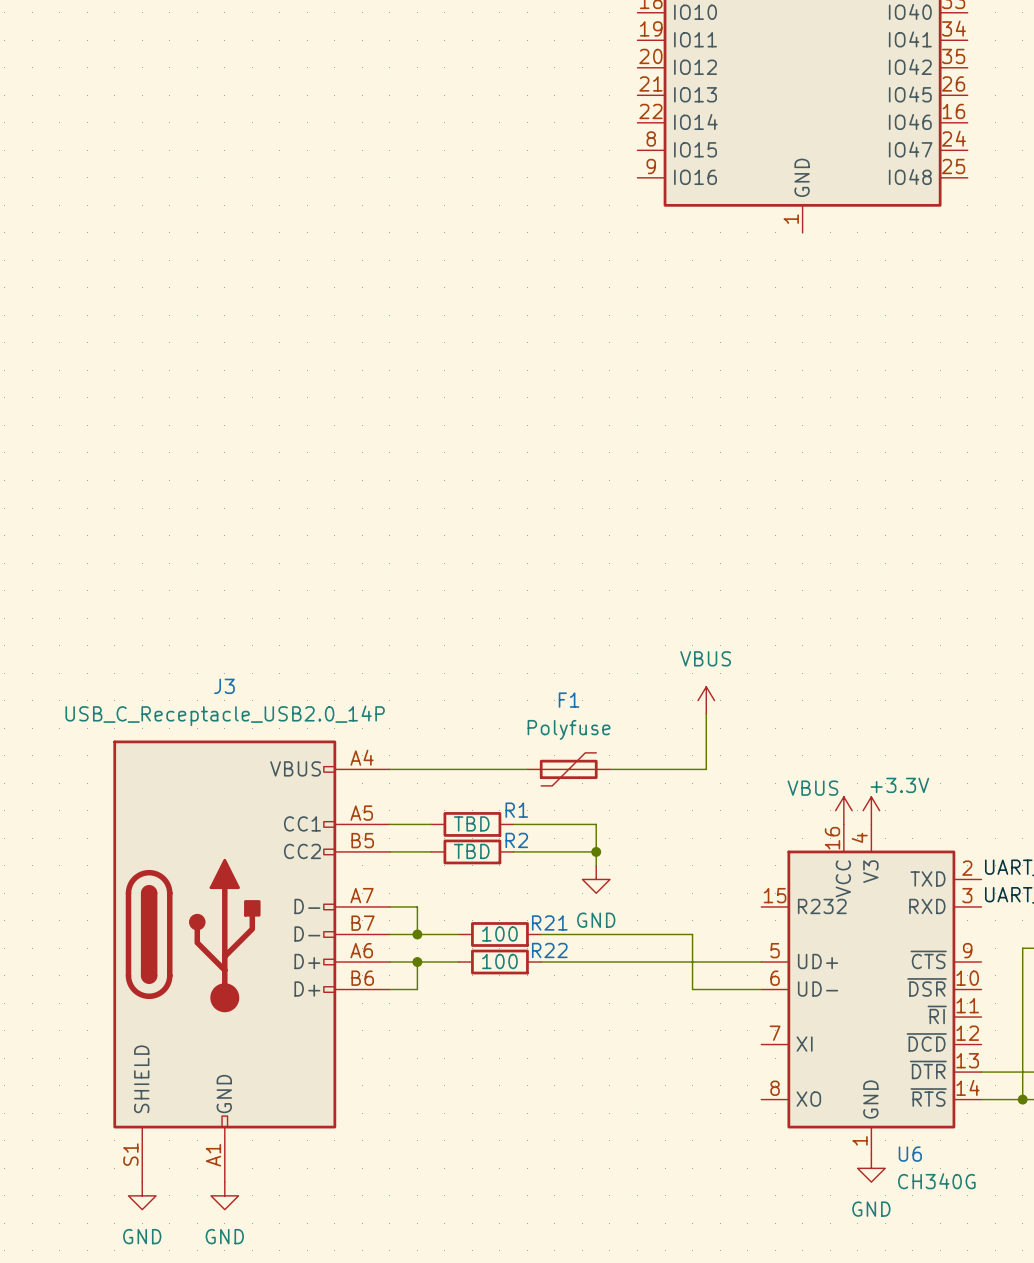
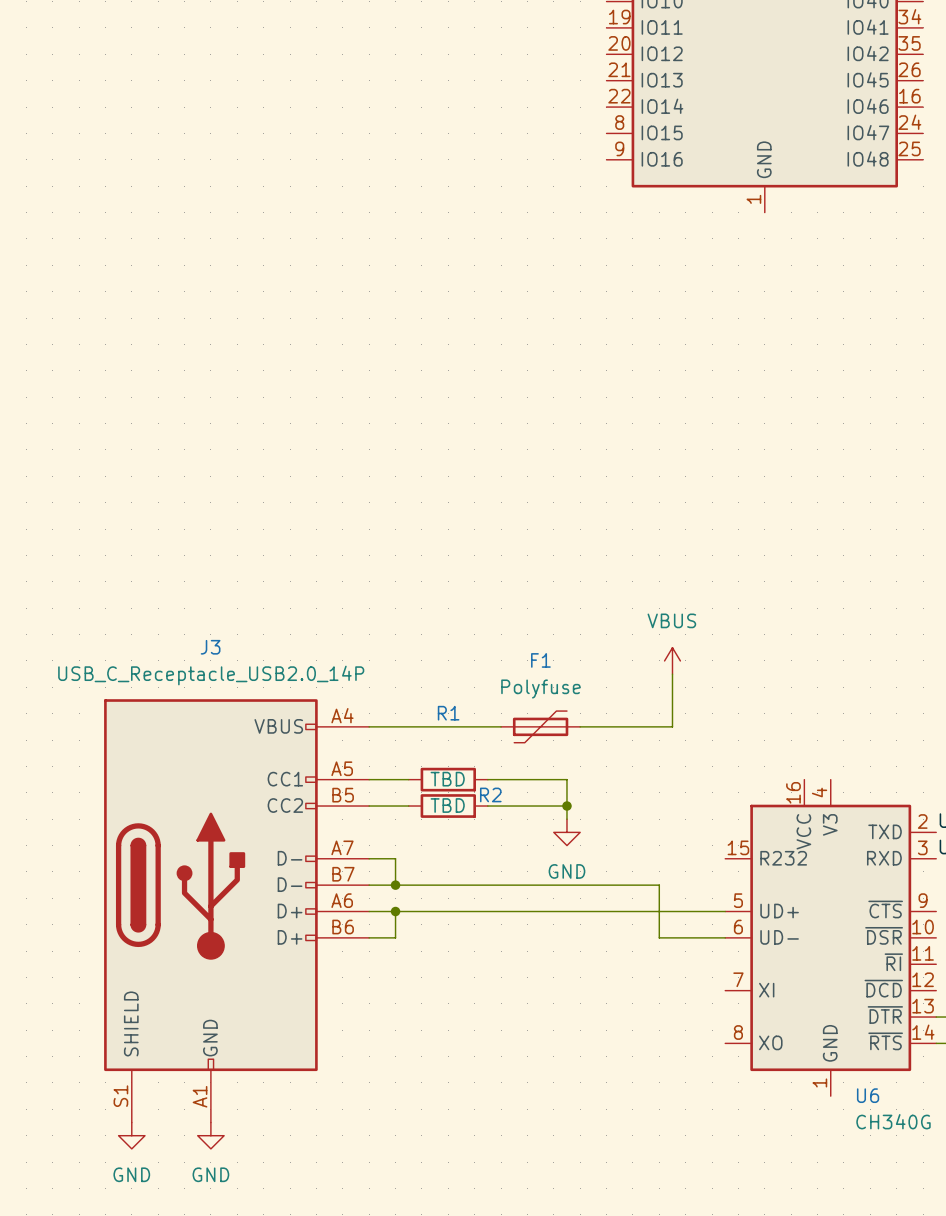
R1 name position: R1 (516, 810) -> R1 (448, 713)
power symbol: VBUS (843, 810) -> none
power symbol: +3.3V (871, 810) -> none
wire: none -> (435, 885) (514, 885)
R21: 100 (499, 934) -> none
wire: none -> (435, 911) (514, 911)
R22: 100 (499, 962) -> none
power symbol: GND (871, 1168) -> none

